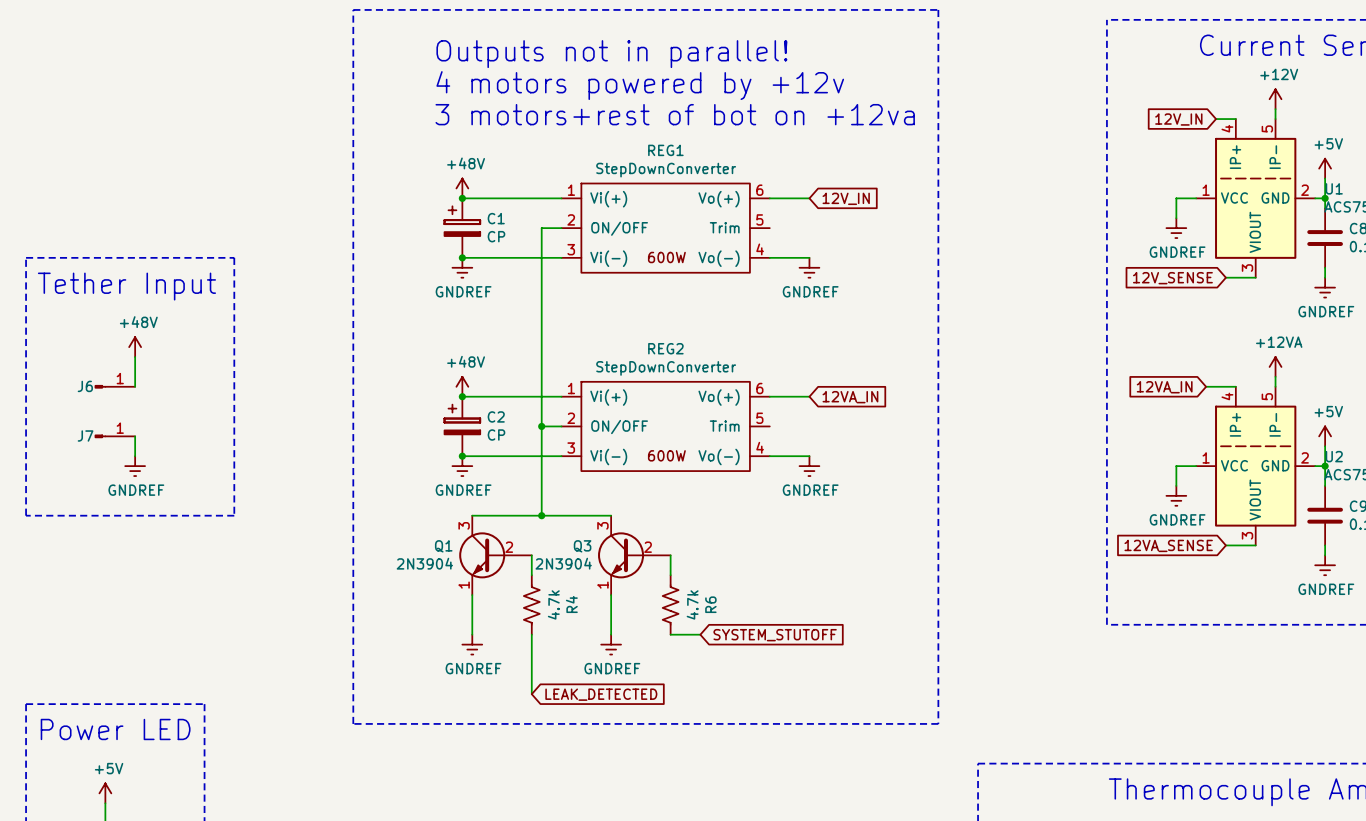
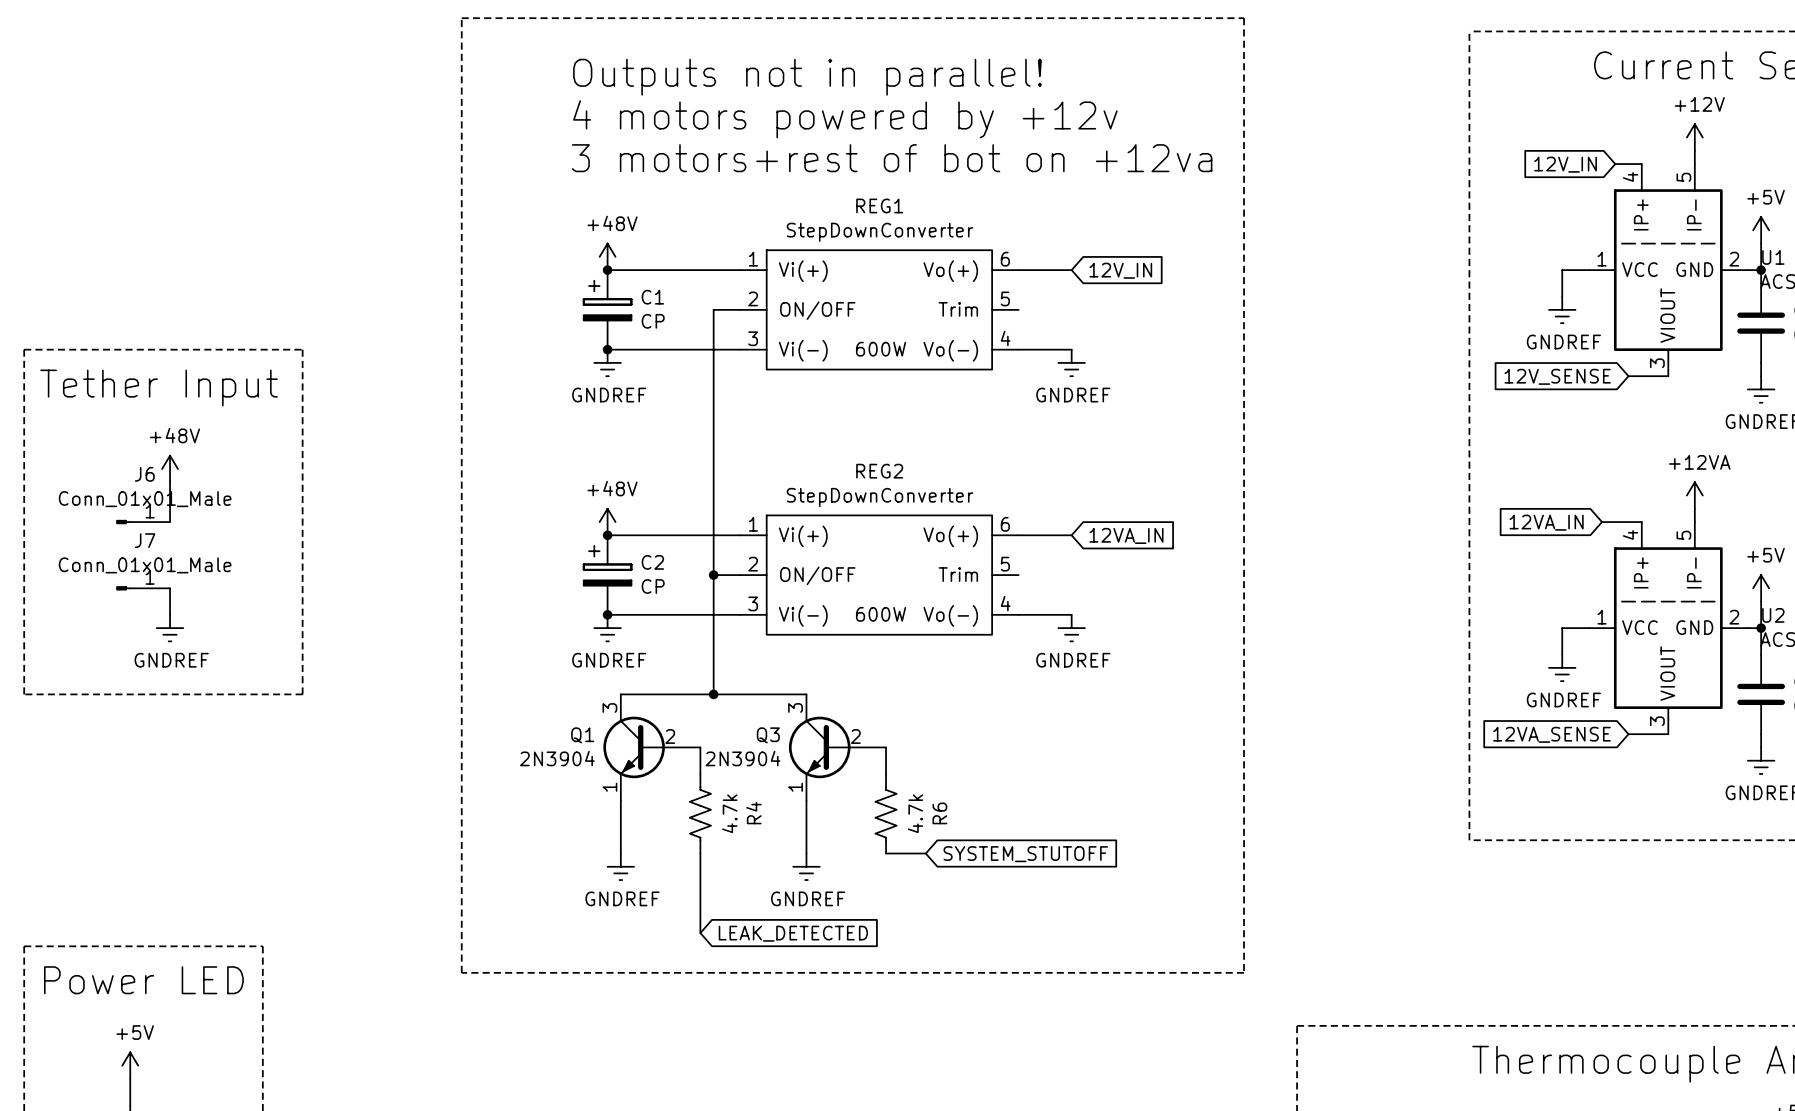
J6 value: none -> Conn_01x01_Male (145, 499)
J6 name position: J6 (85, 386) -> J6 (144, 474)
J7 value: none -> Conn_01x01_Male (145, 565)
J7 name position: J7 (85, 435) -> J7 (145, 540)

